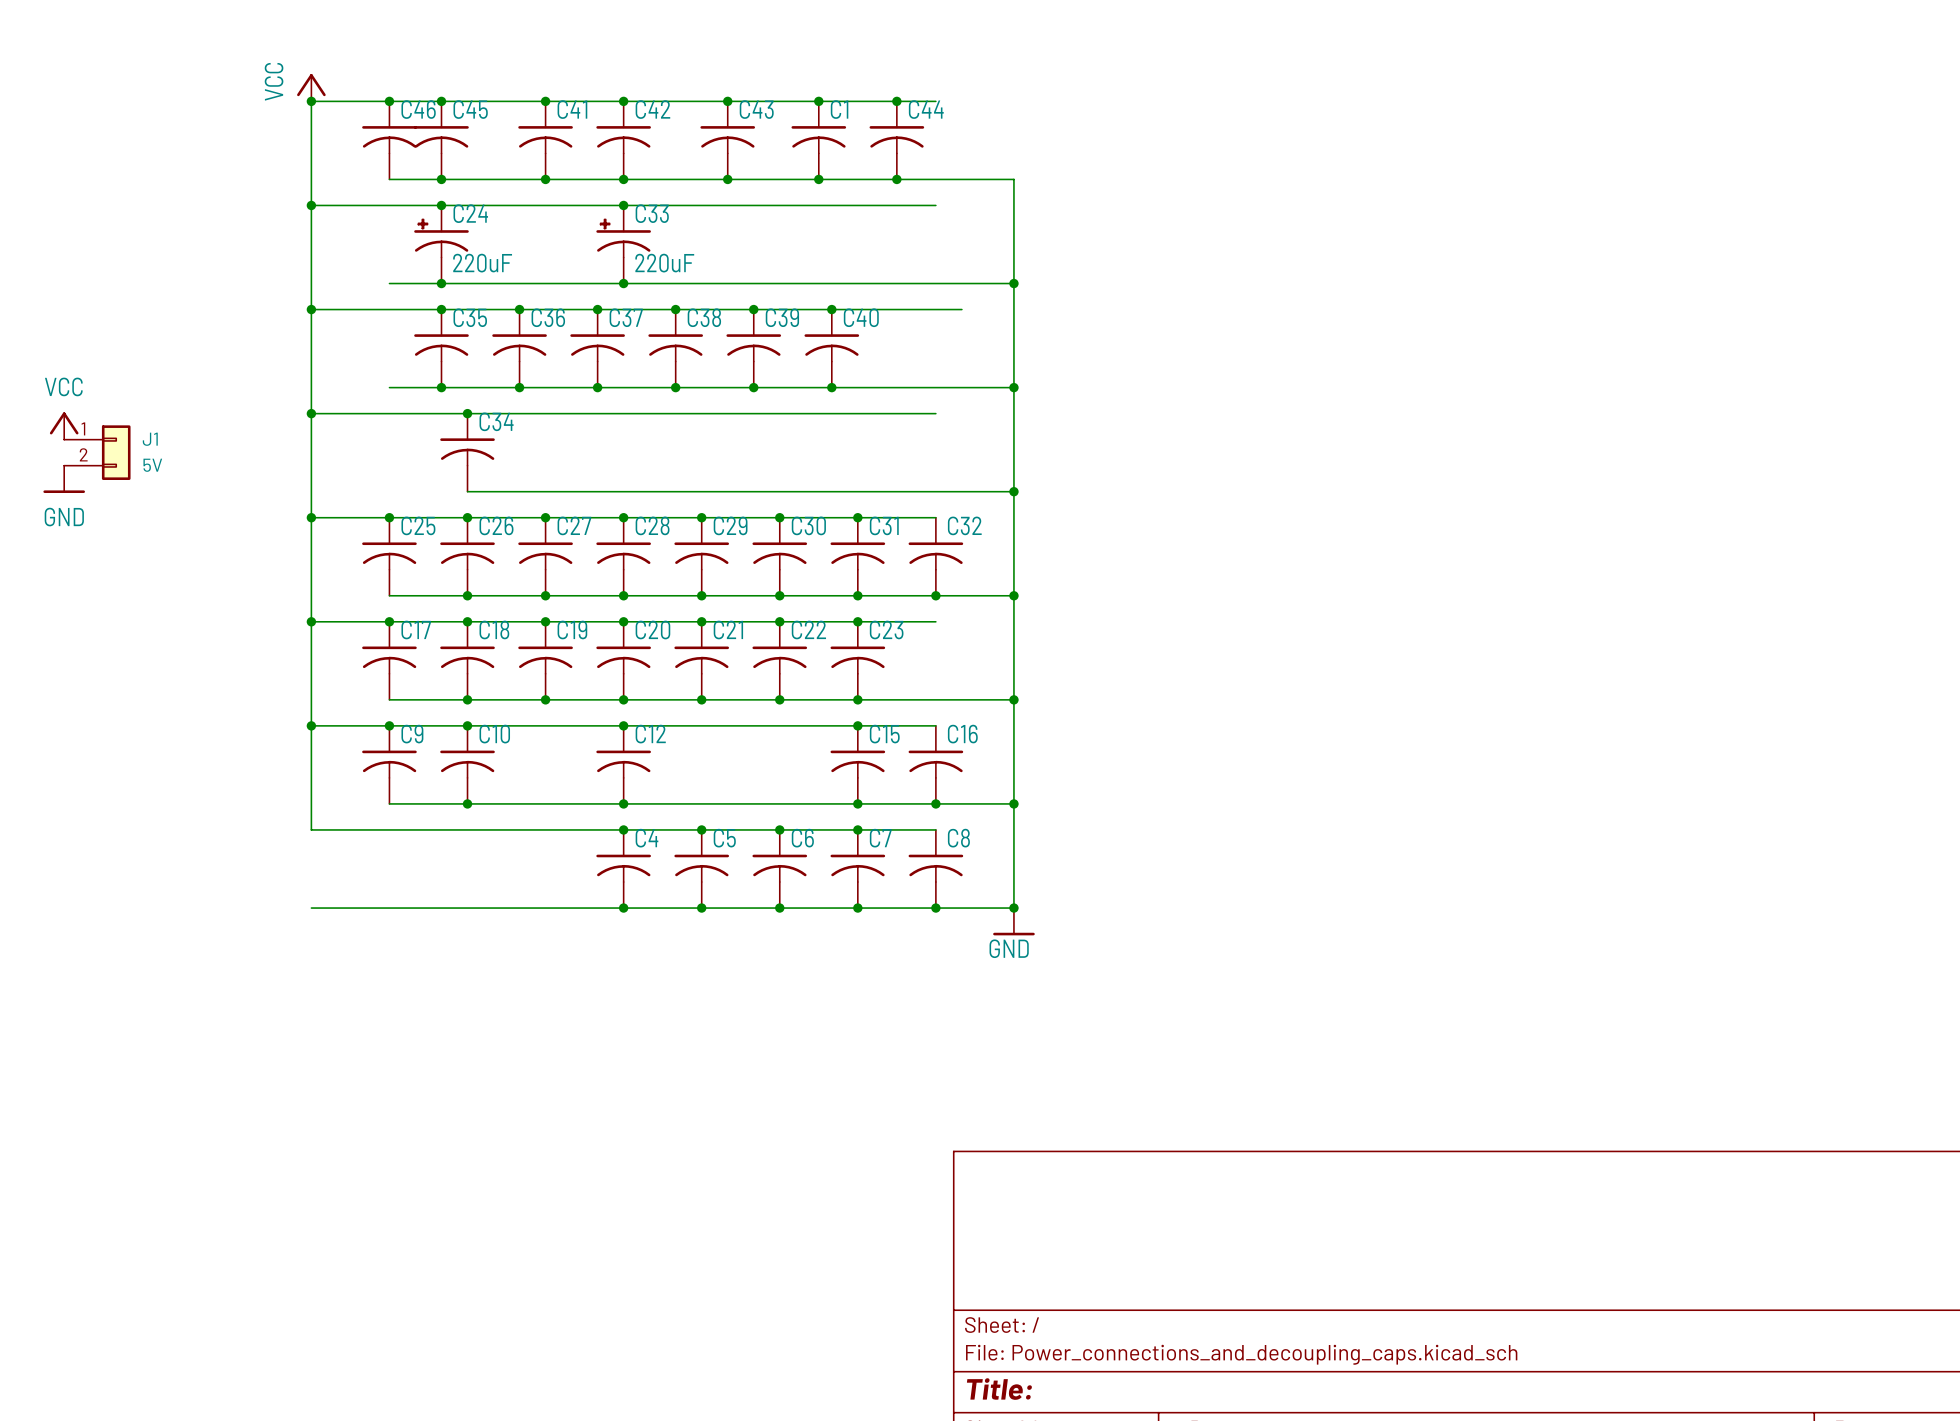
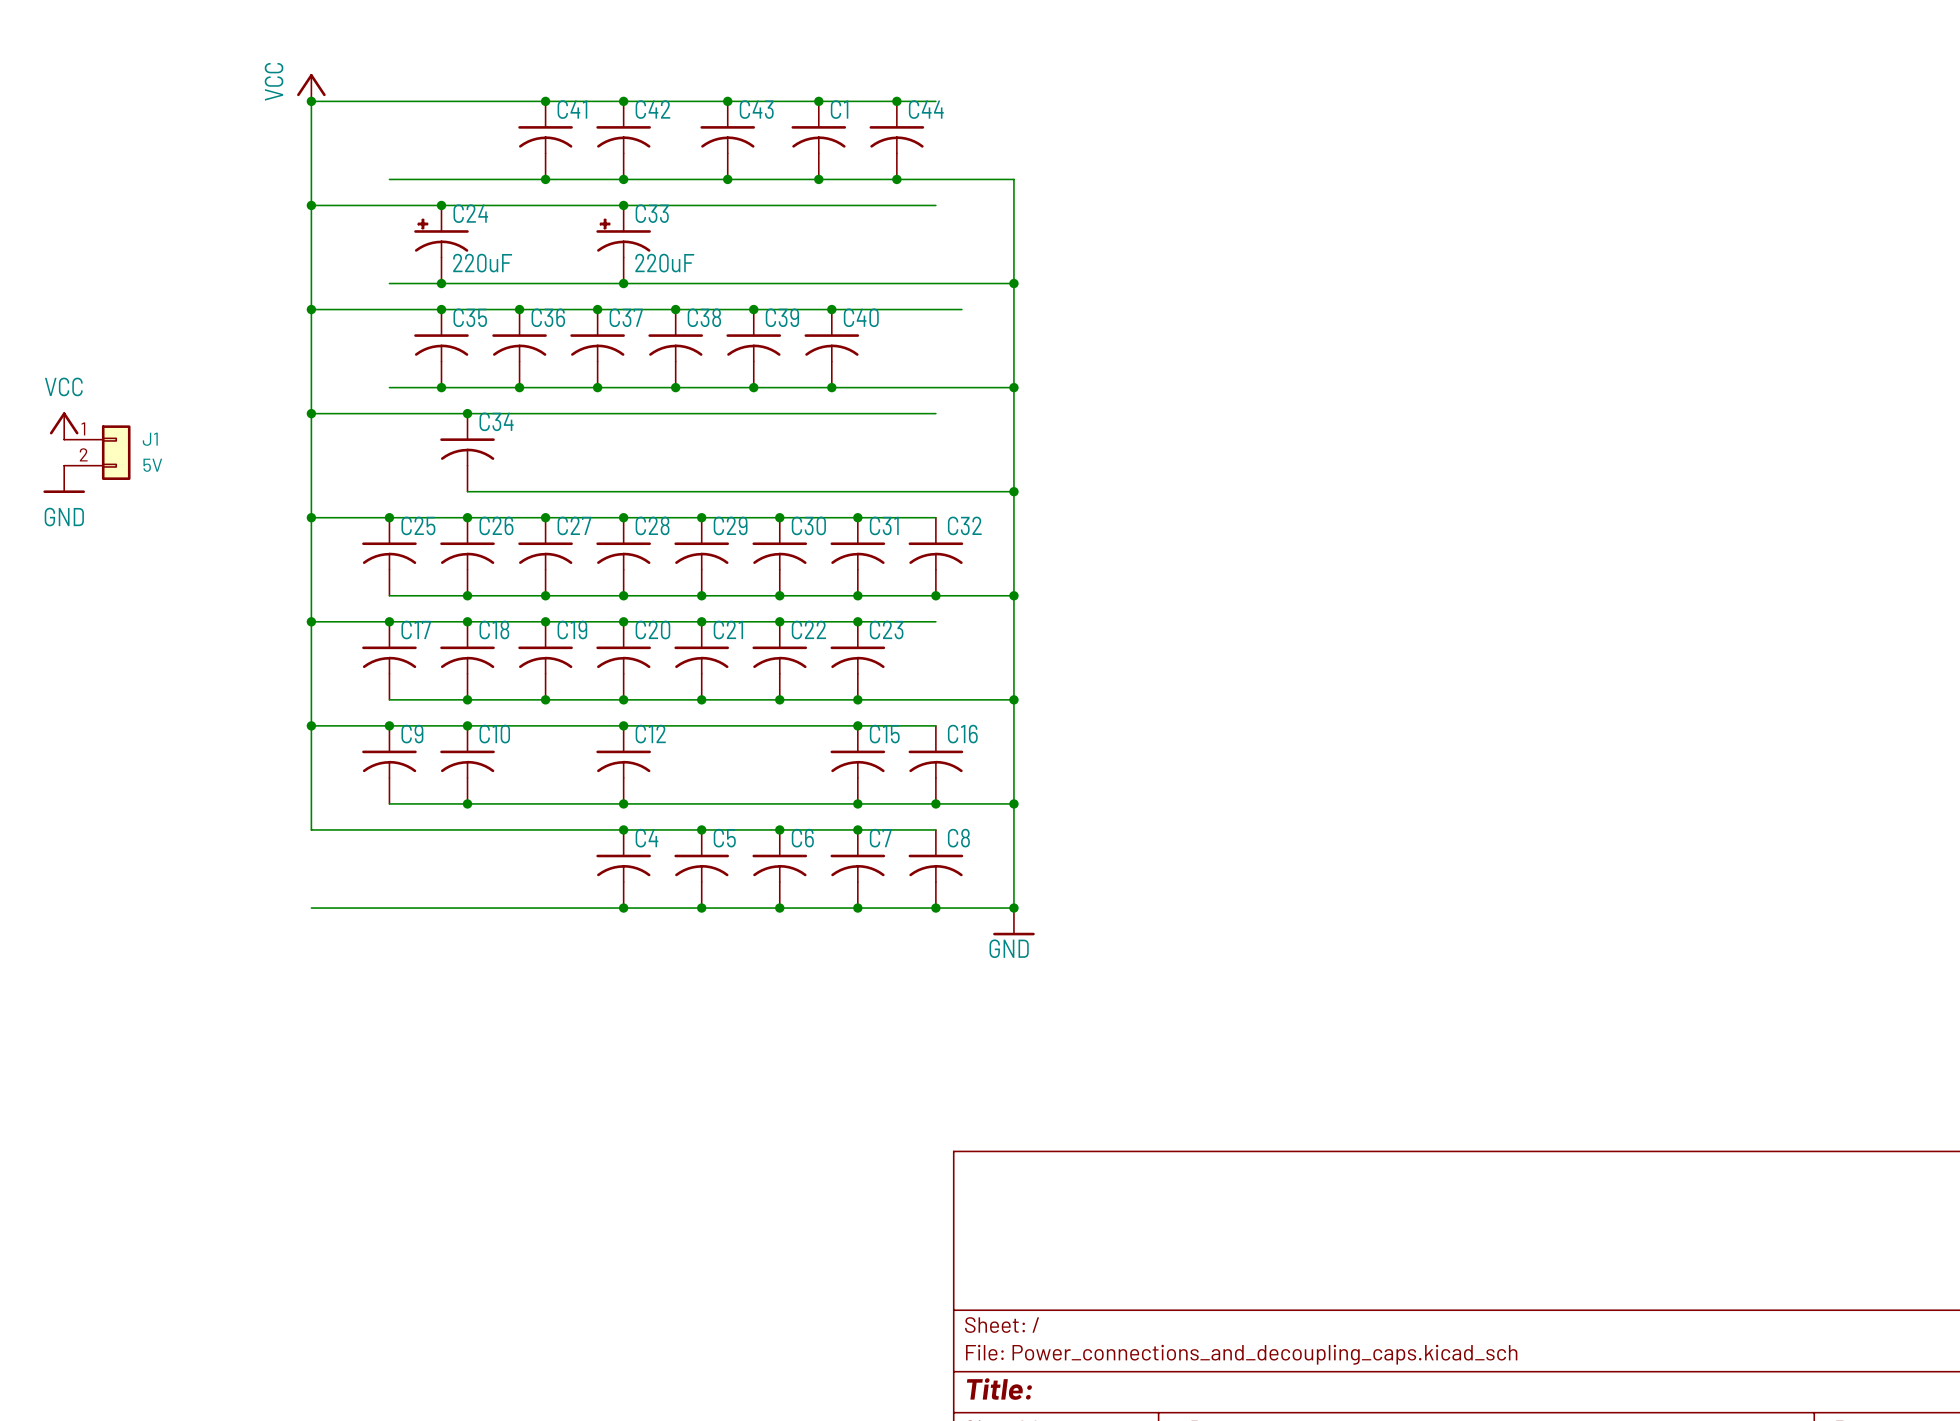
junction: (389, 101) -> none
junction: (441, 101) -> none
C46: (389, 140) -> none
C45: (441, 140) -> none
junction: (441, 179) -> none

